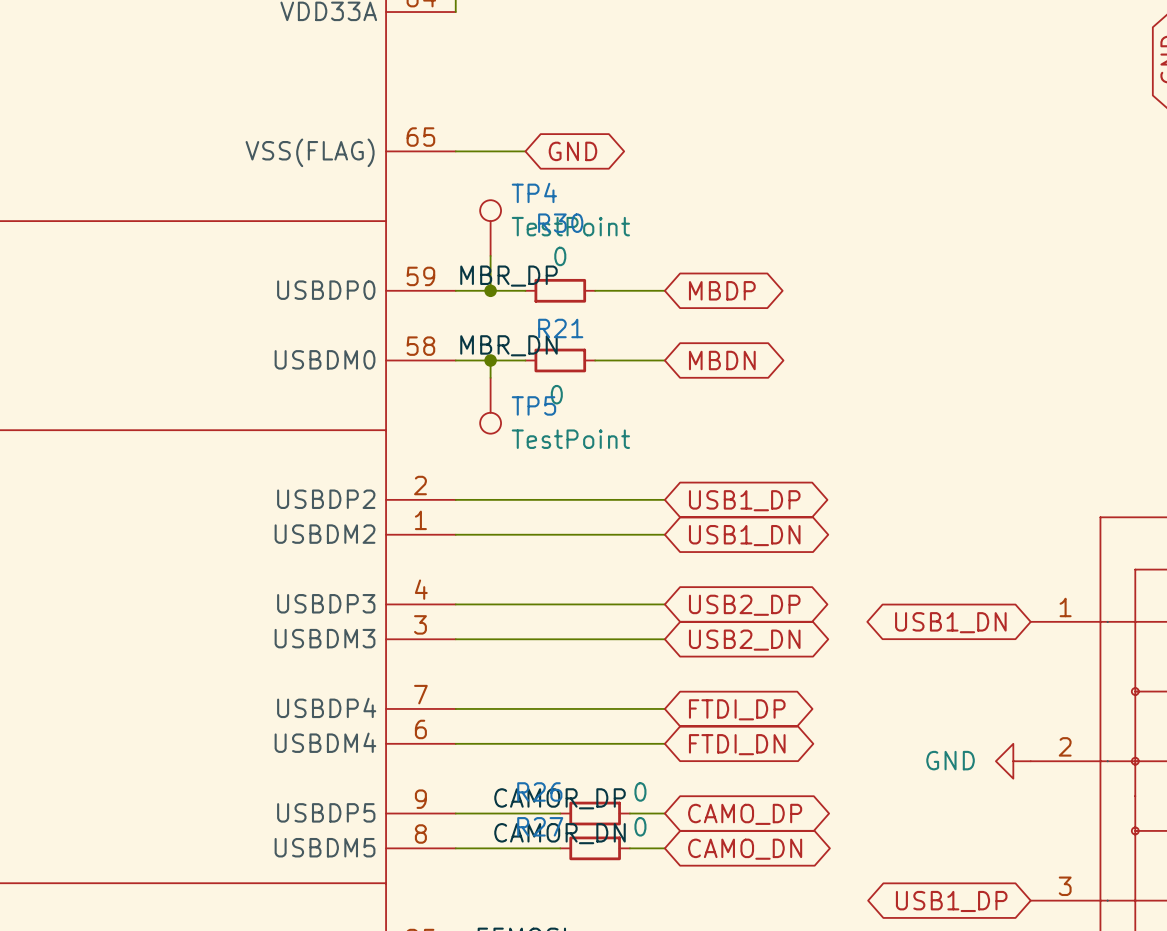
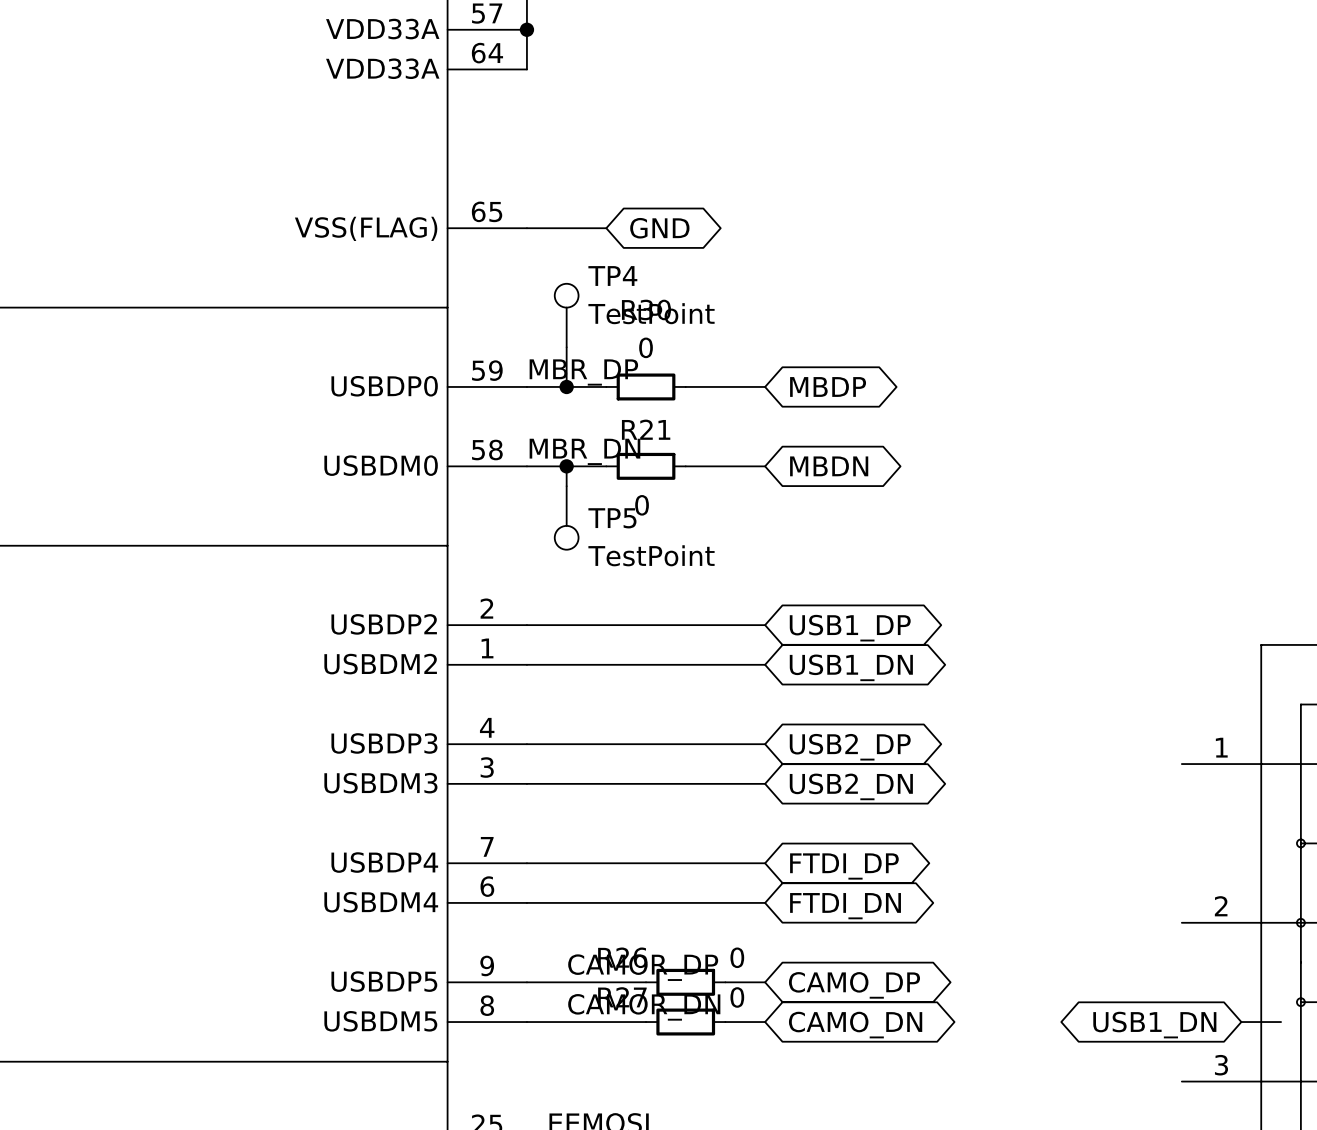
global label: USB1_DN (950, 622) -> none
power symbol: GND (1013, 761) -> none
wire: none -> (1241, 1022) (1281, 1022)
global label: none -> USB1_DN (1154, 1025)
global label: USB1_DP (951, 901) -> none

